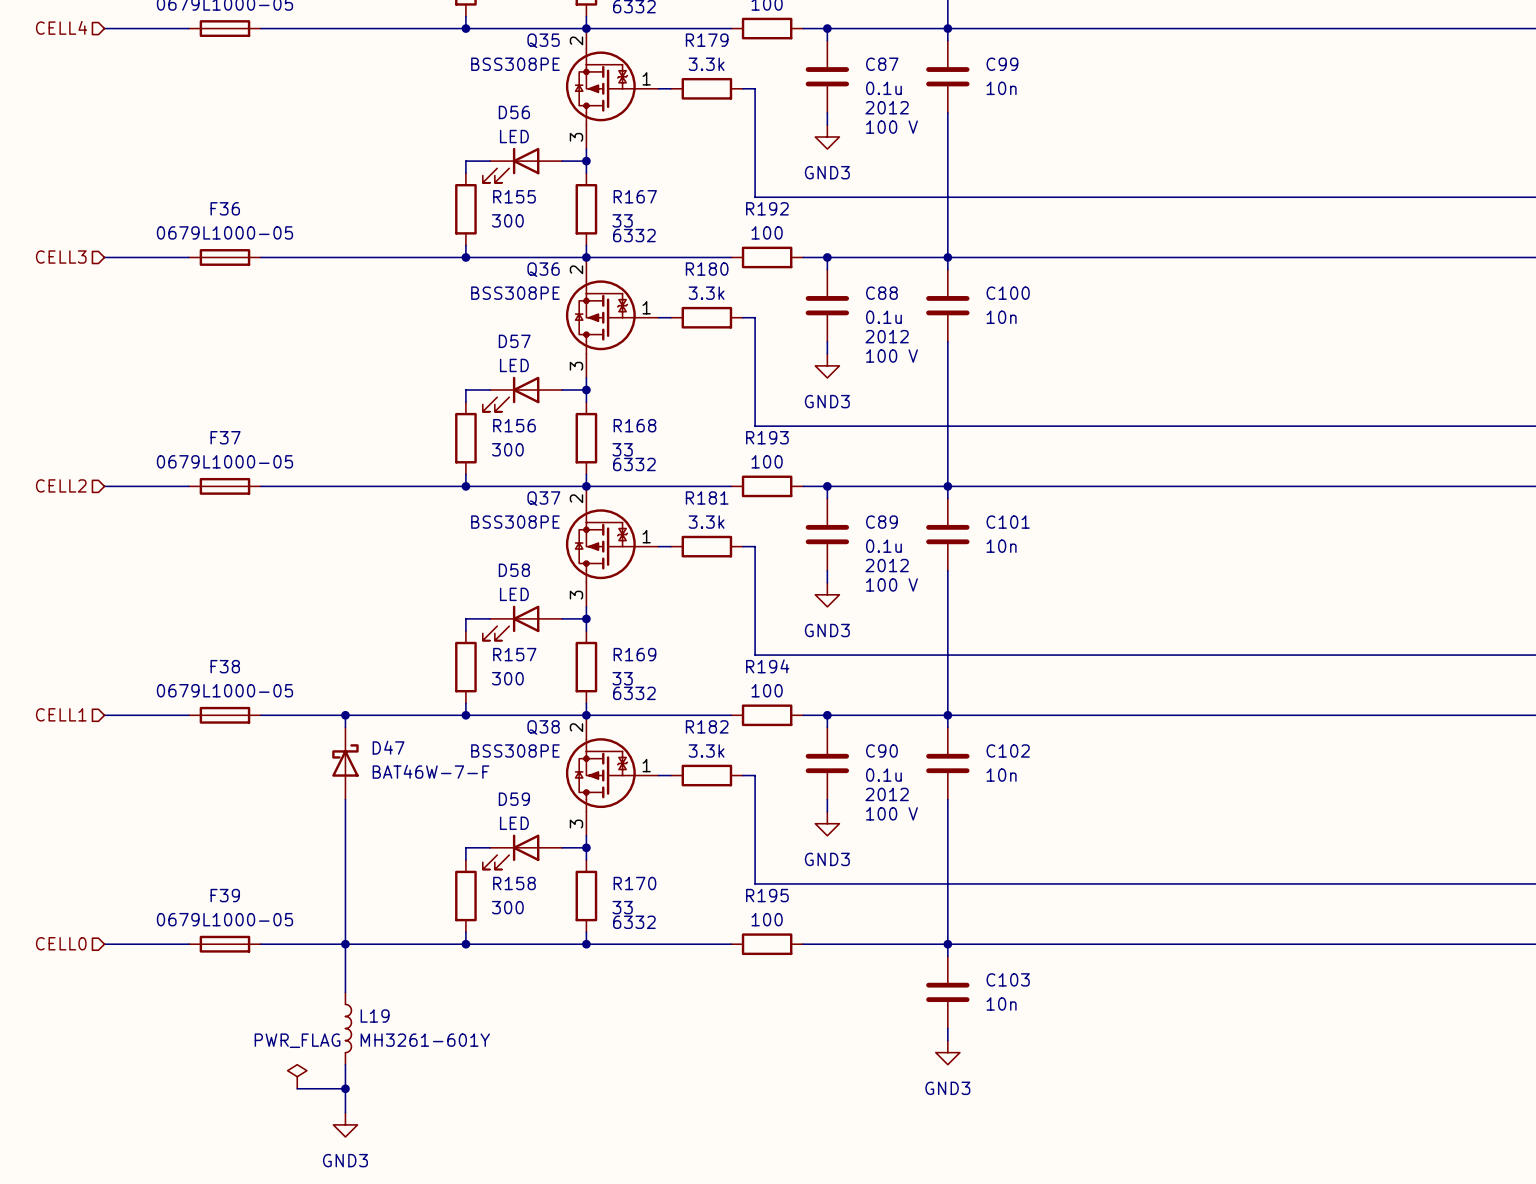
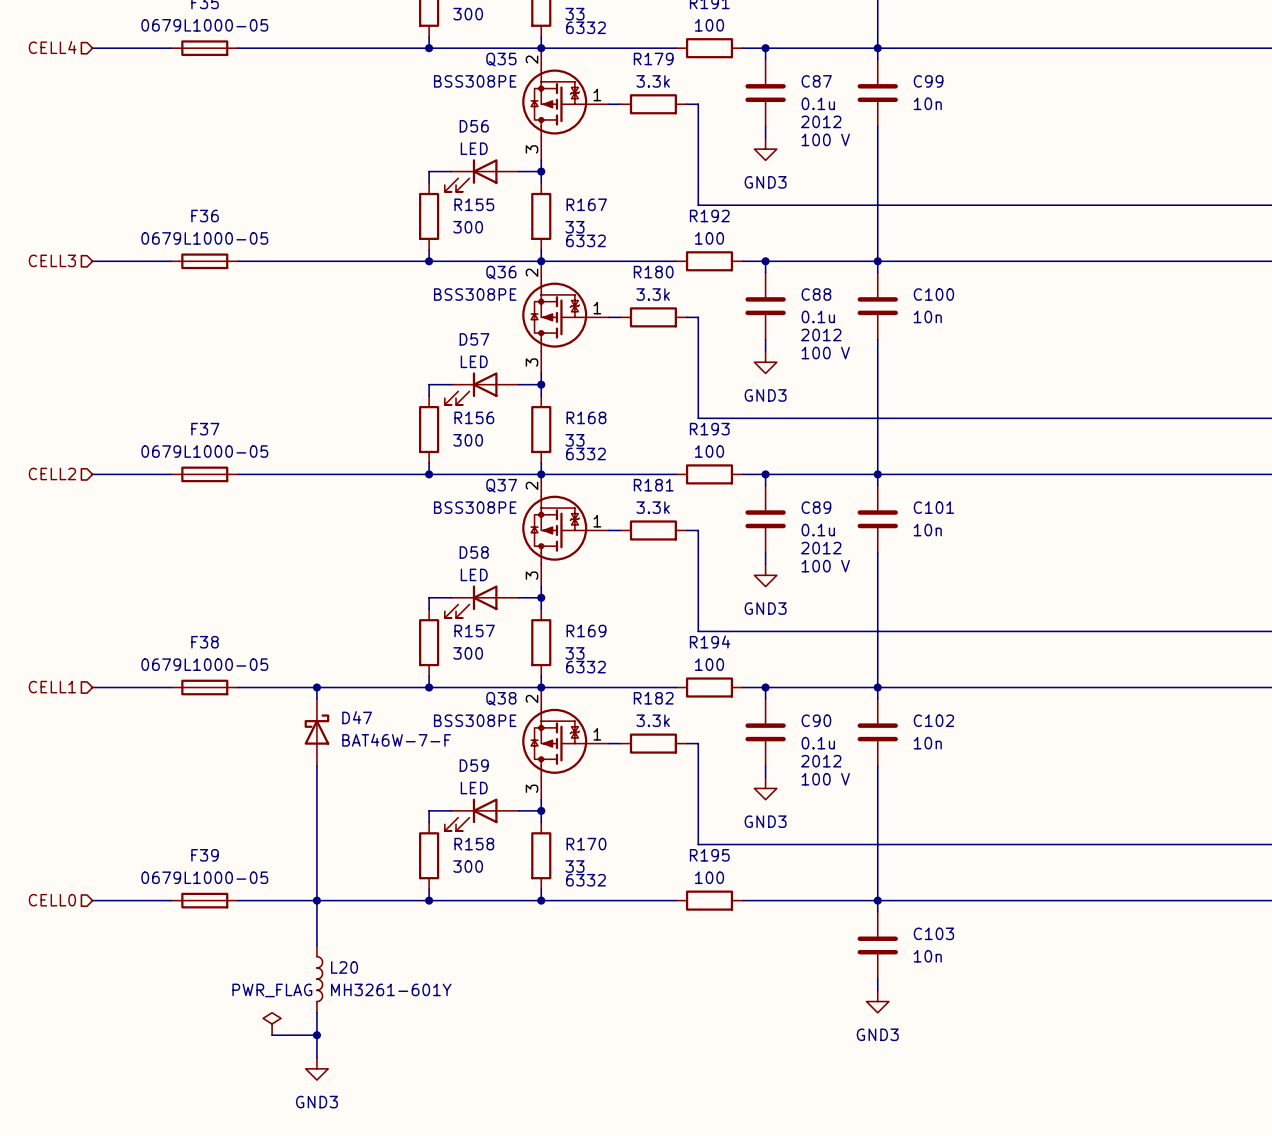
L19 name: L19 (375, 1016) -> L20 (344, 967)

